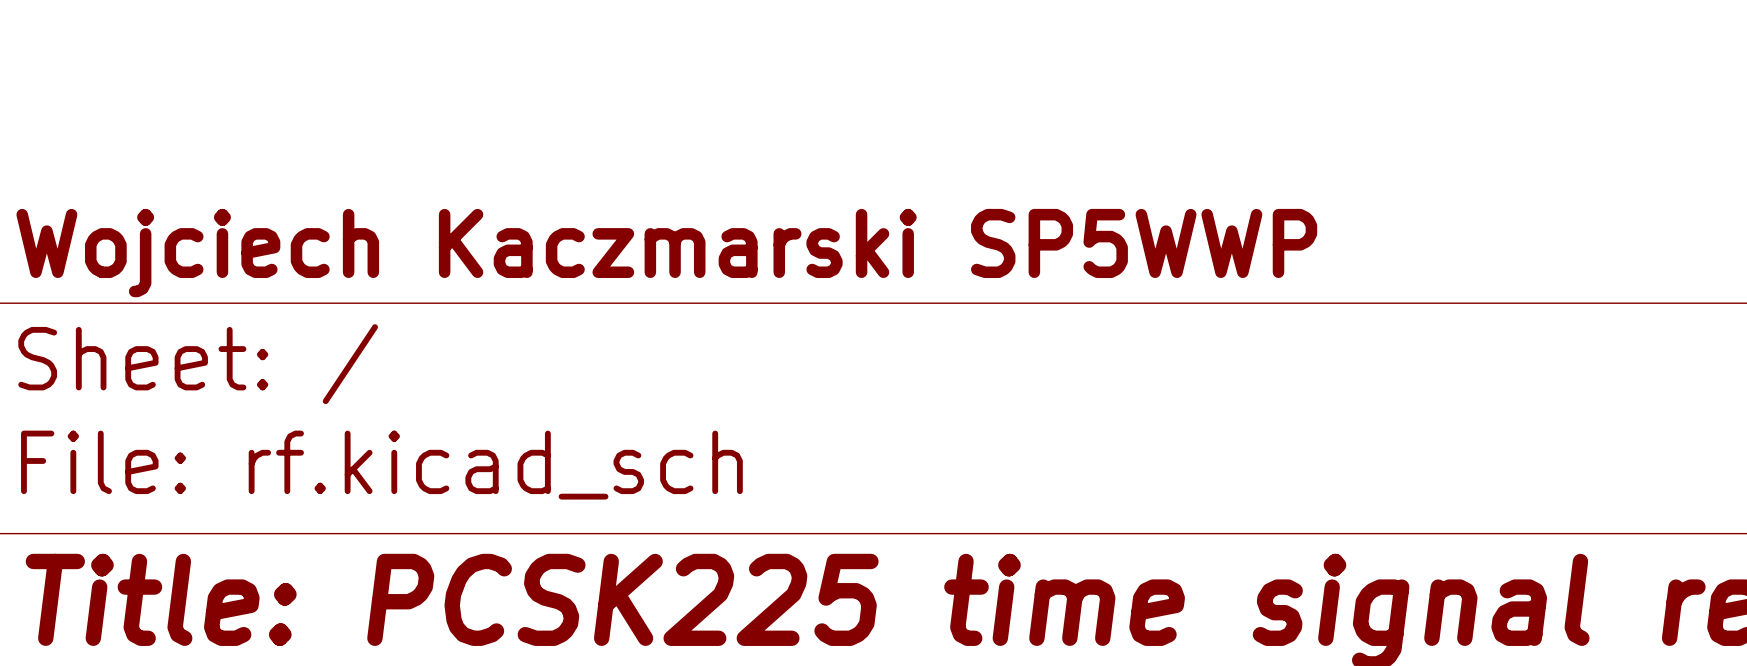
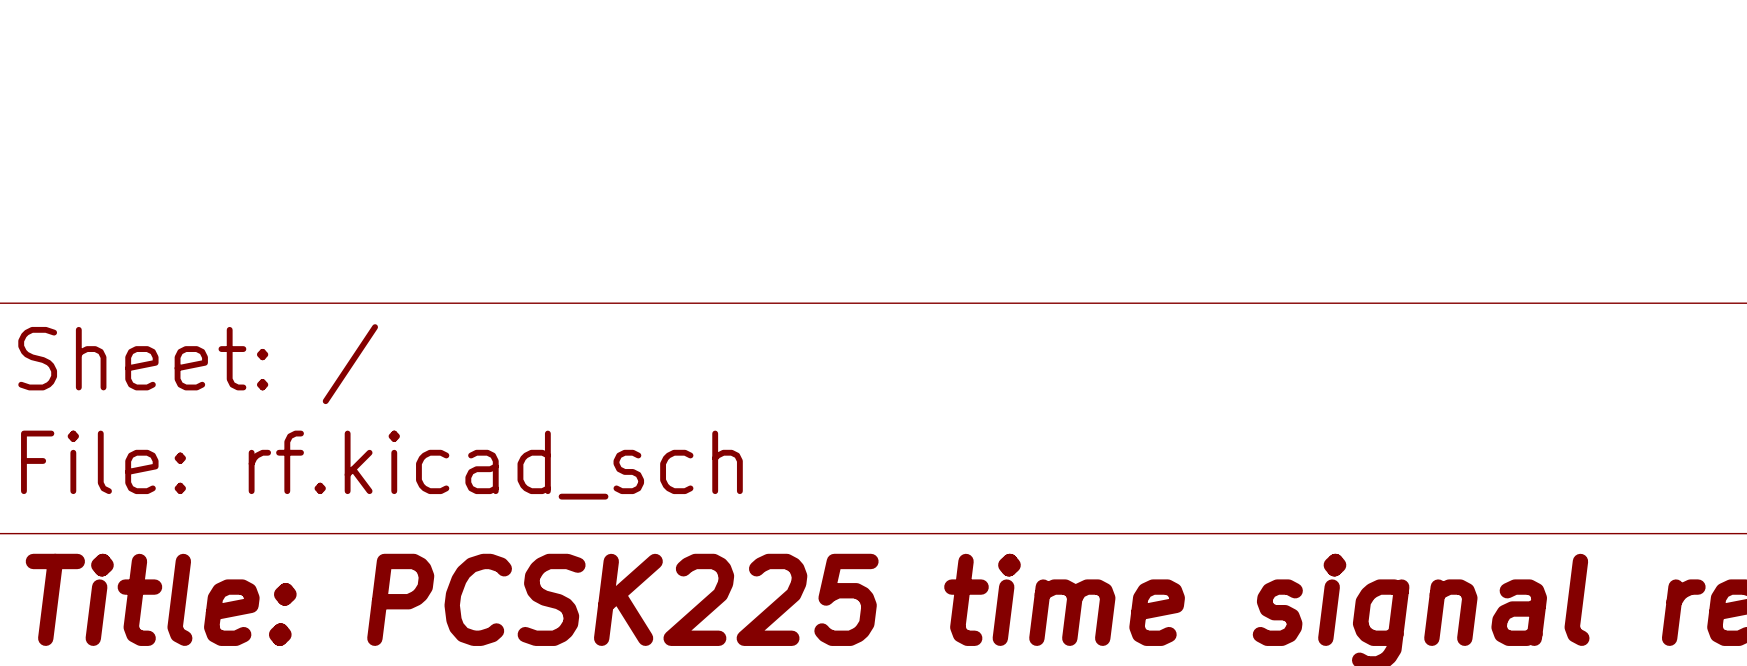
title block: Wojciech Kaczmarski SP5WWP (666, 253) -> none

